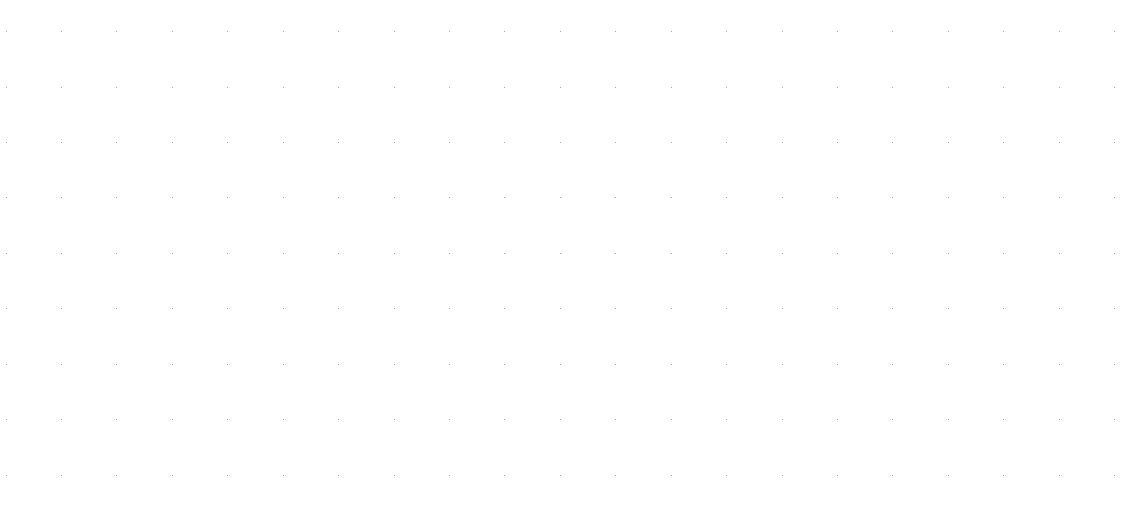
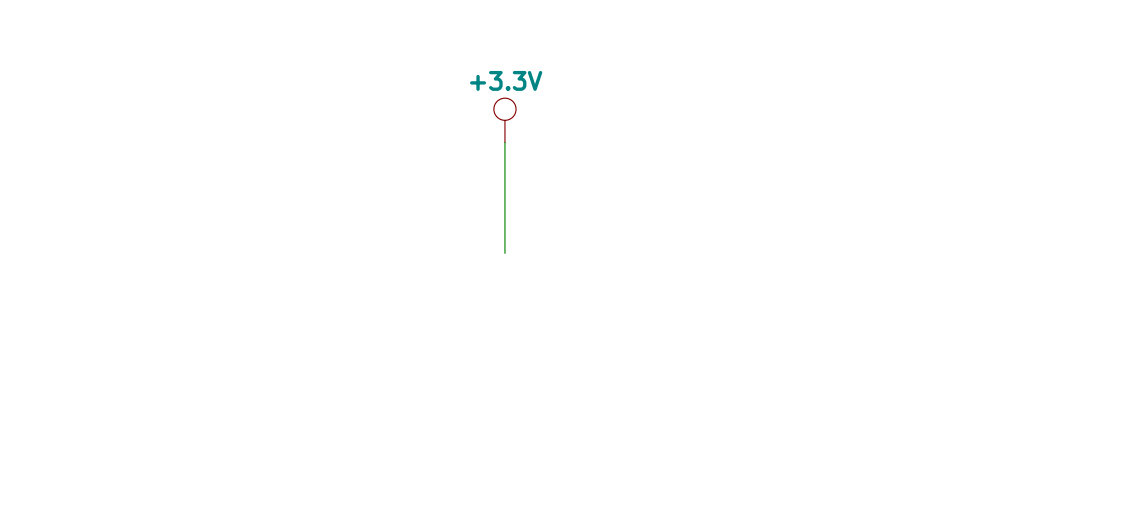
power symbol: none -> +3.3V (504, 120)
wire: none -> (504, 142) (504, 253)

